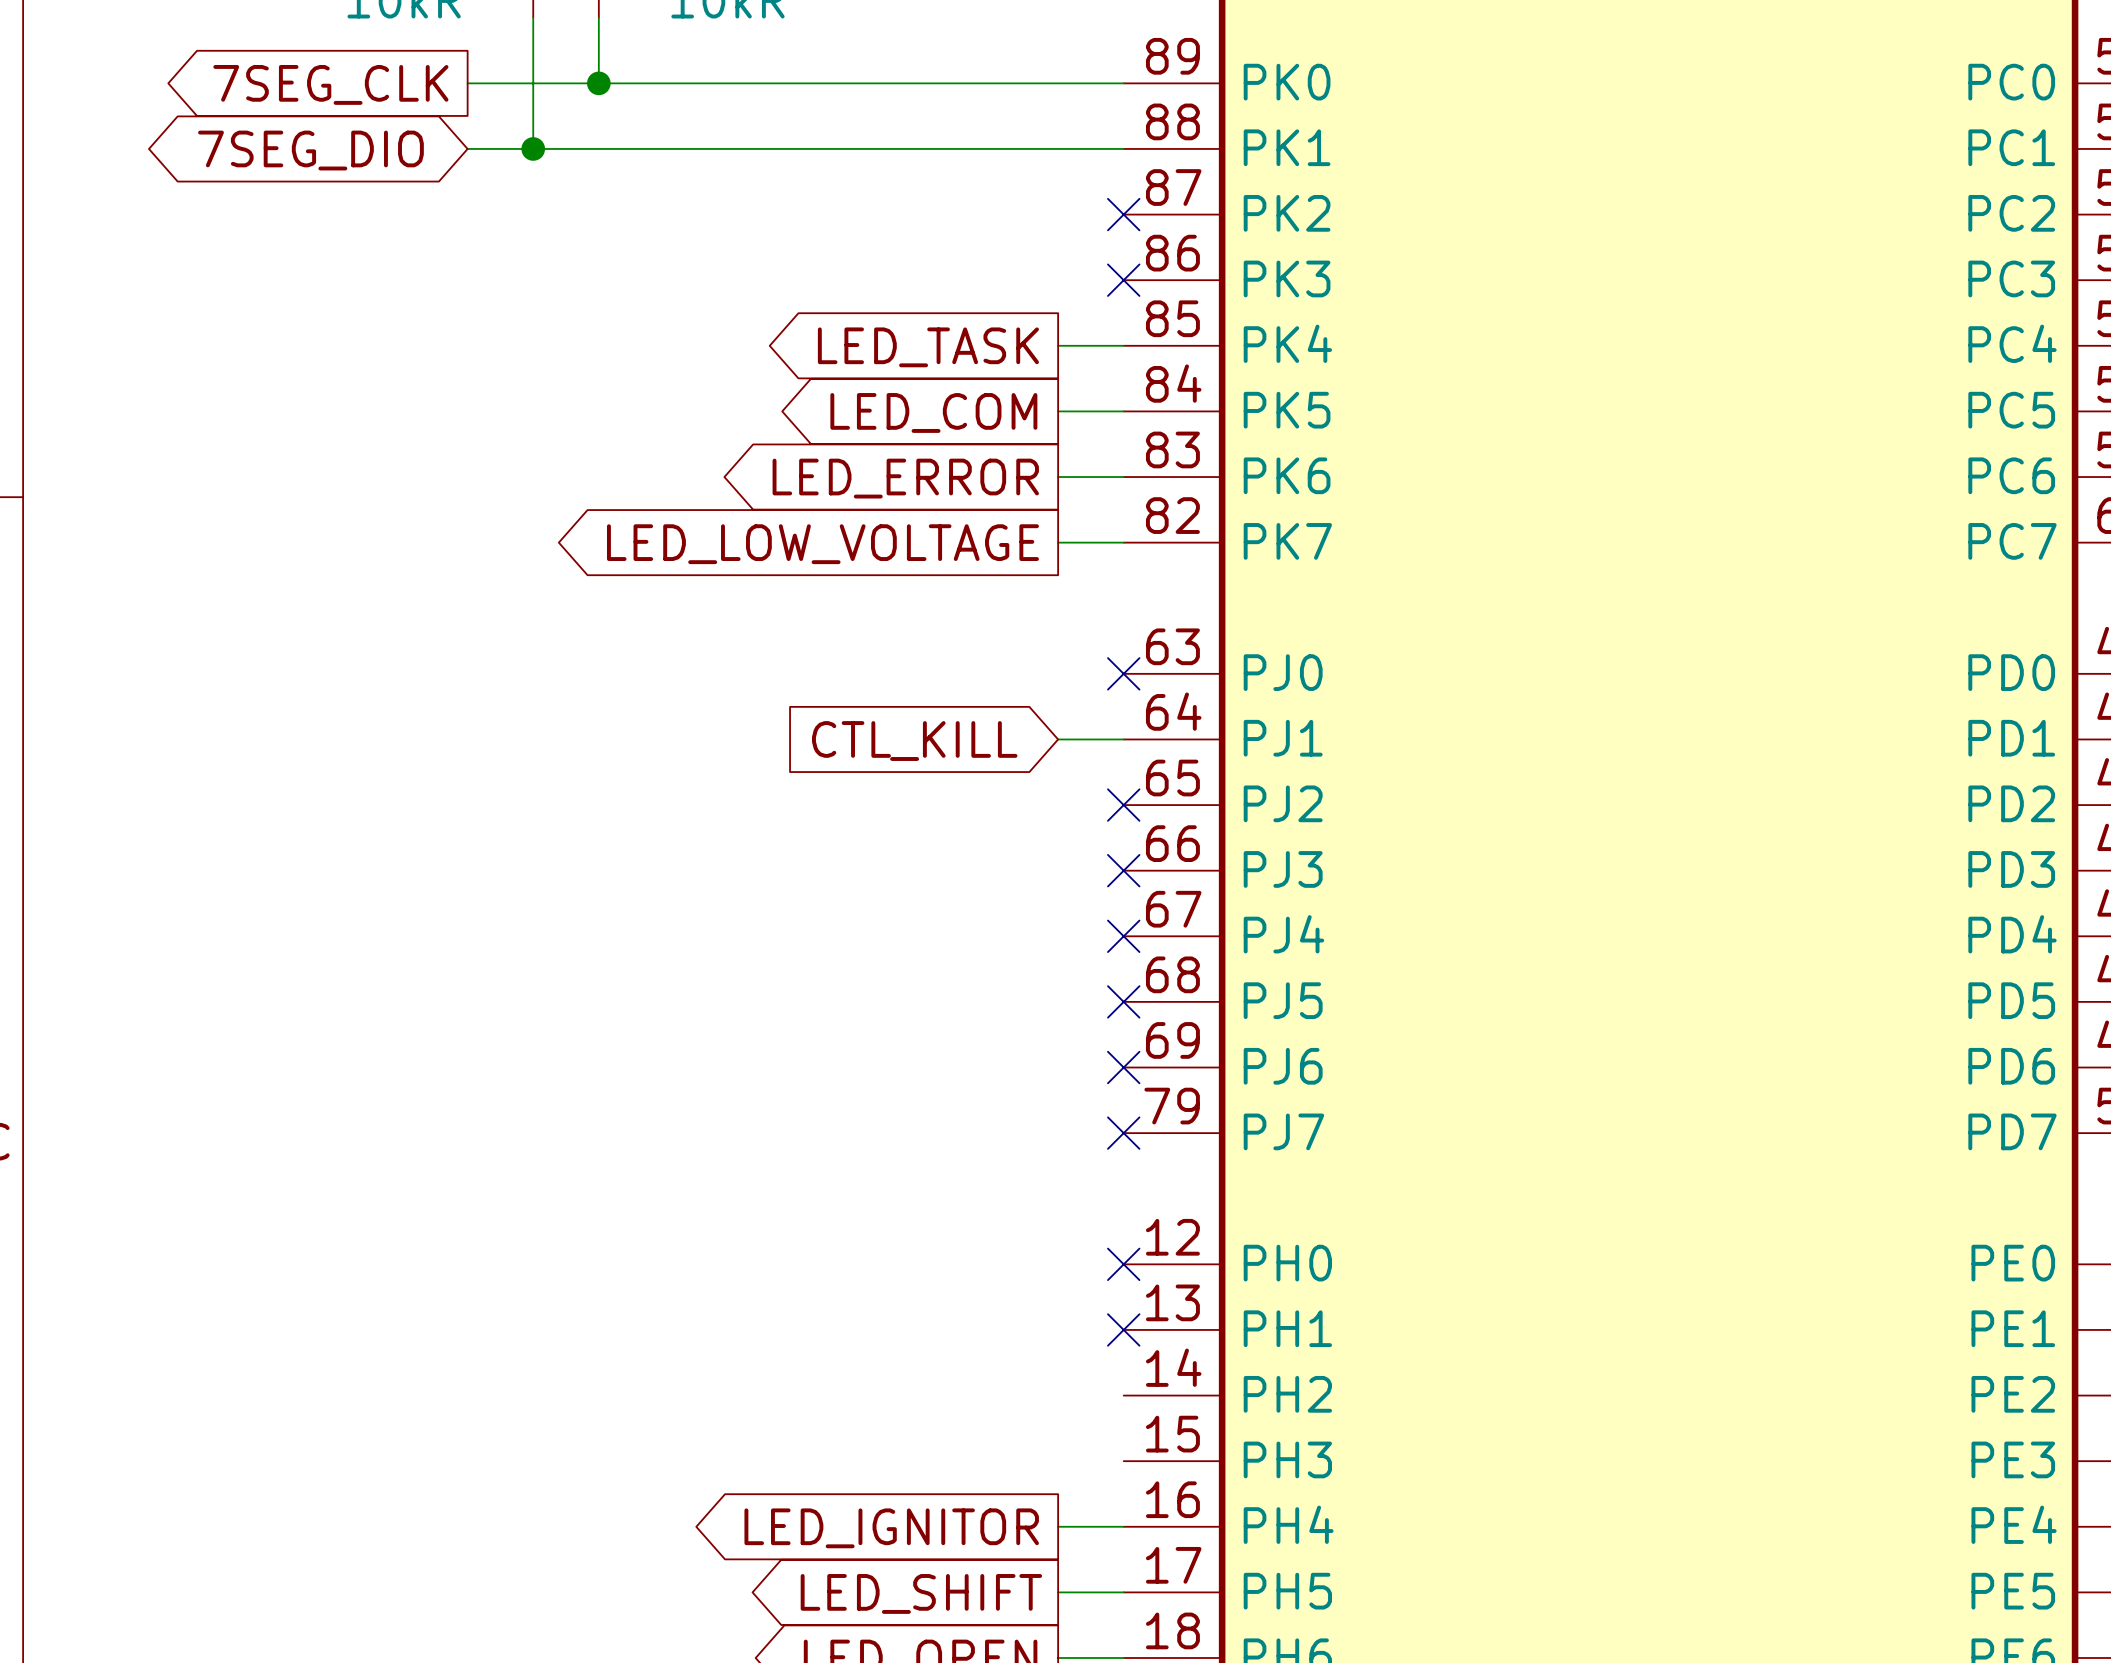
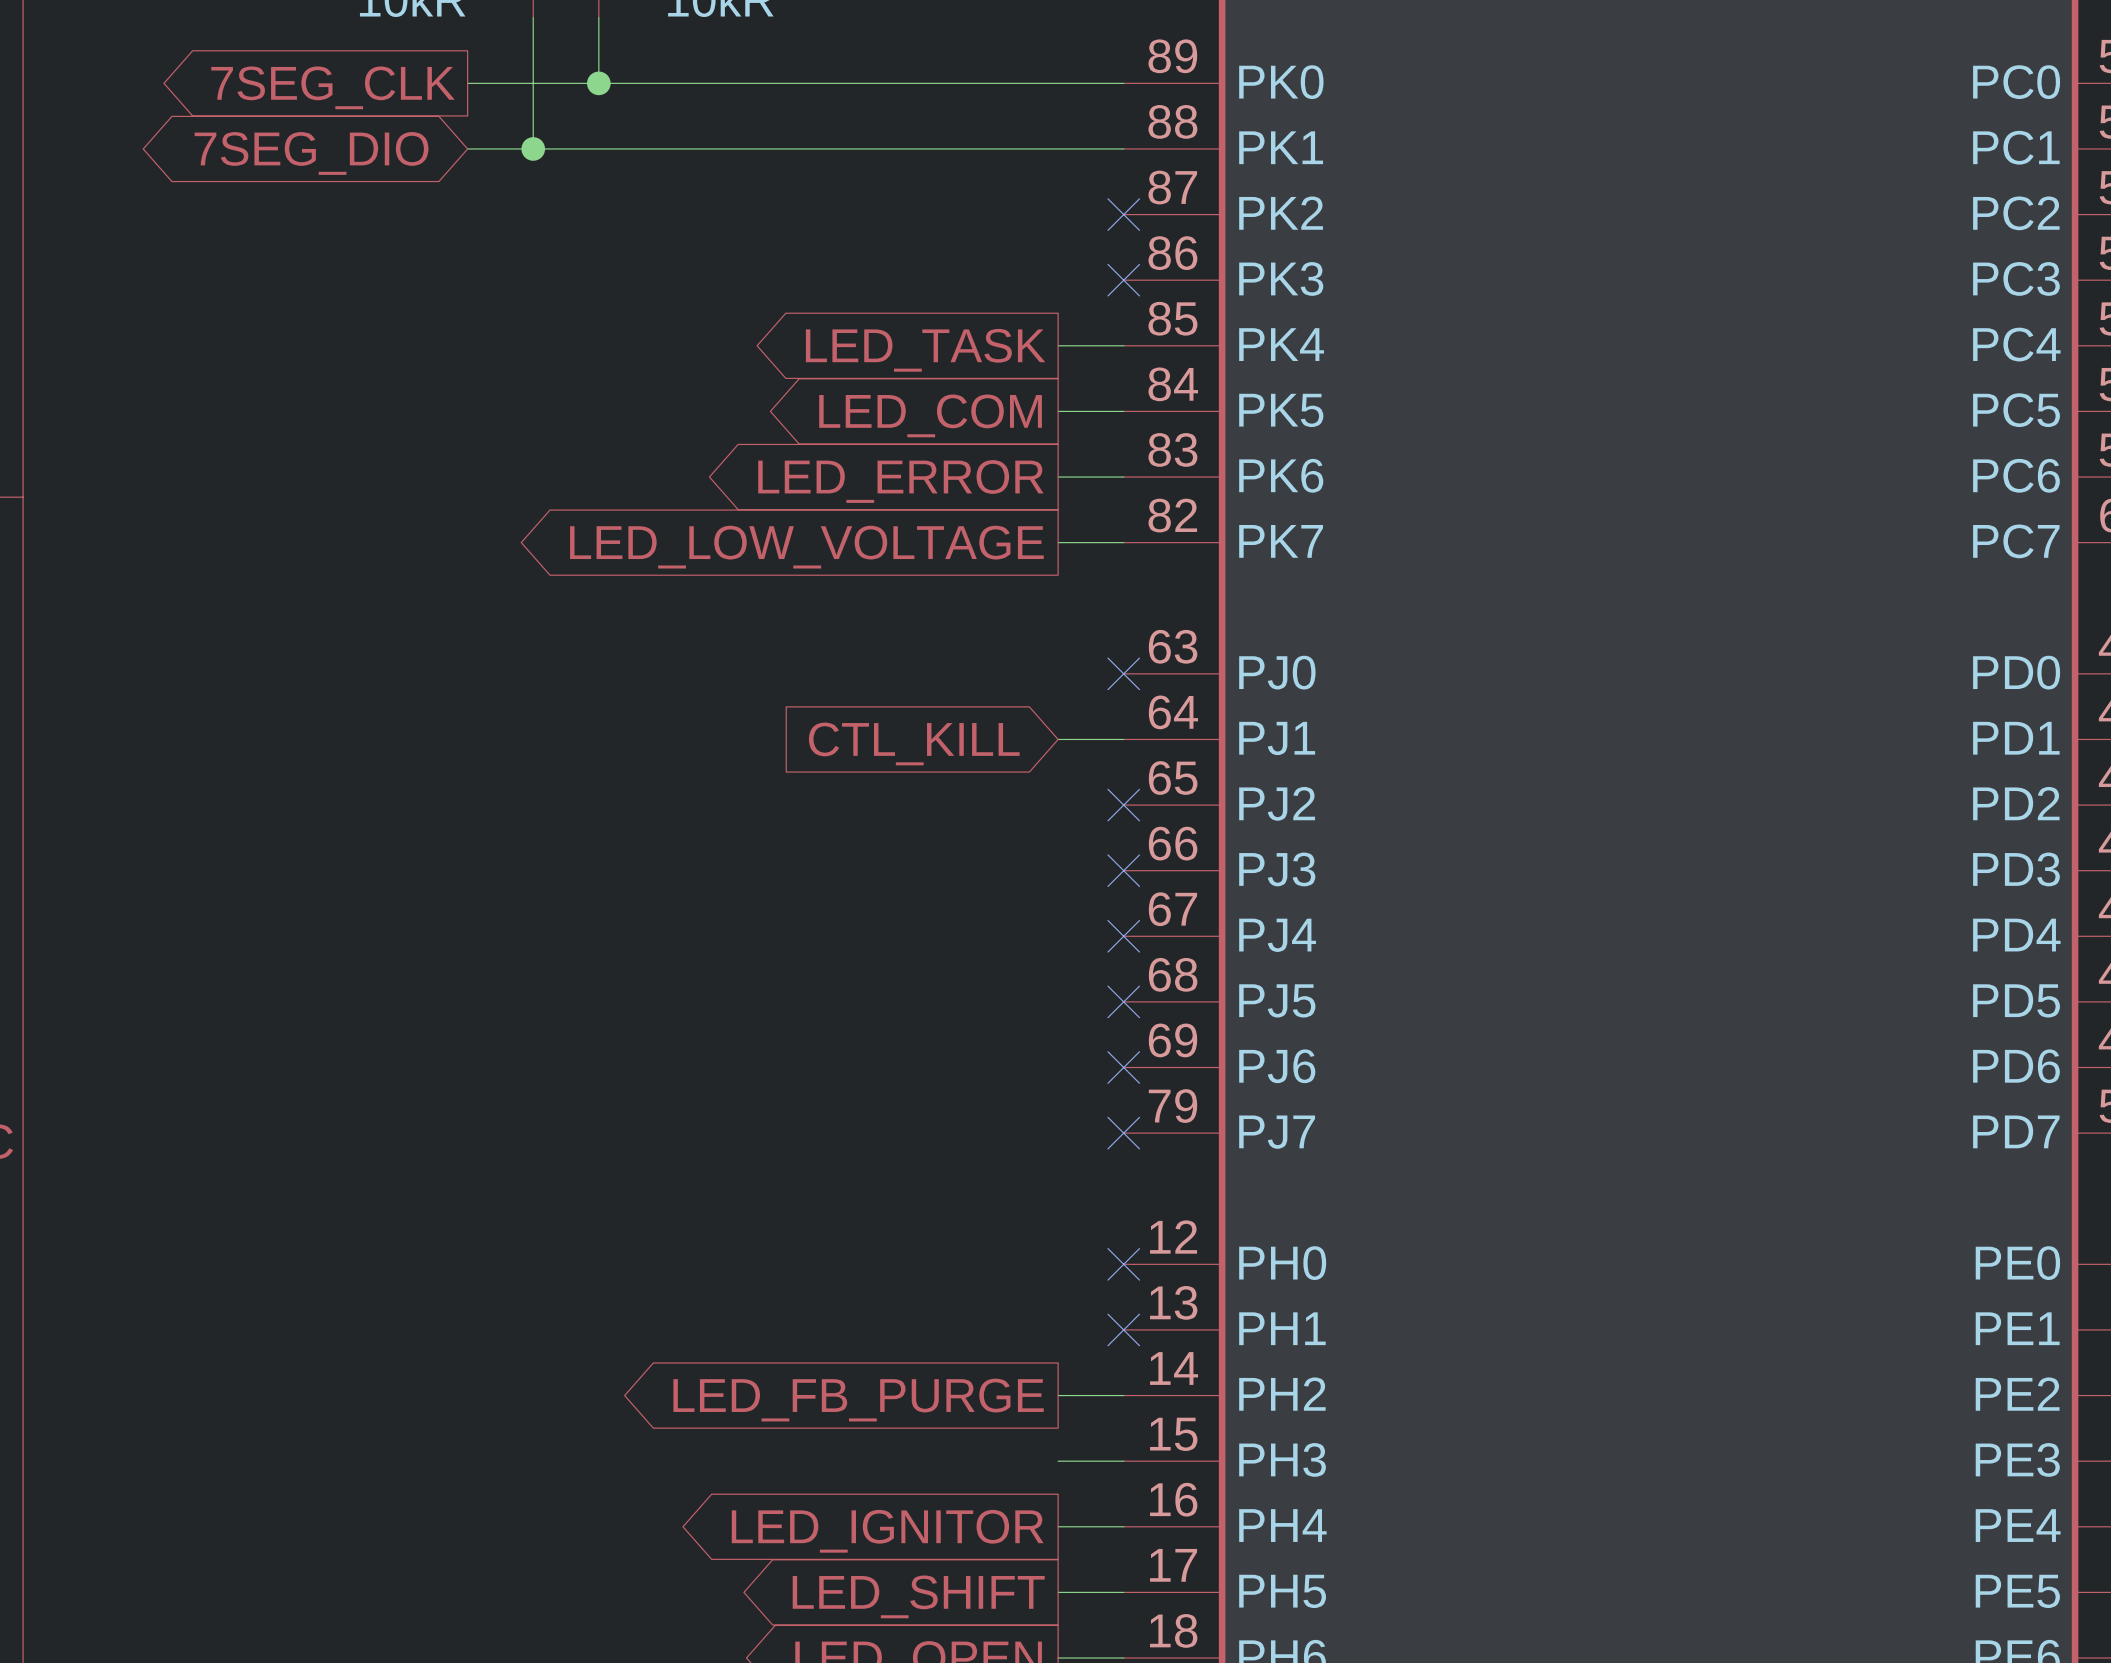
wire: none -> (1058, 1395) (1123, 1395)
global label: none -> LED_FB_PURGE (858, 1400)
wire: none -> (1058, 1461) (1123, 1461)

